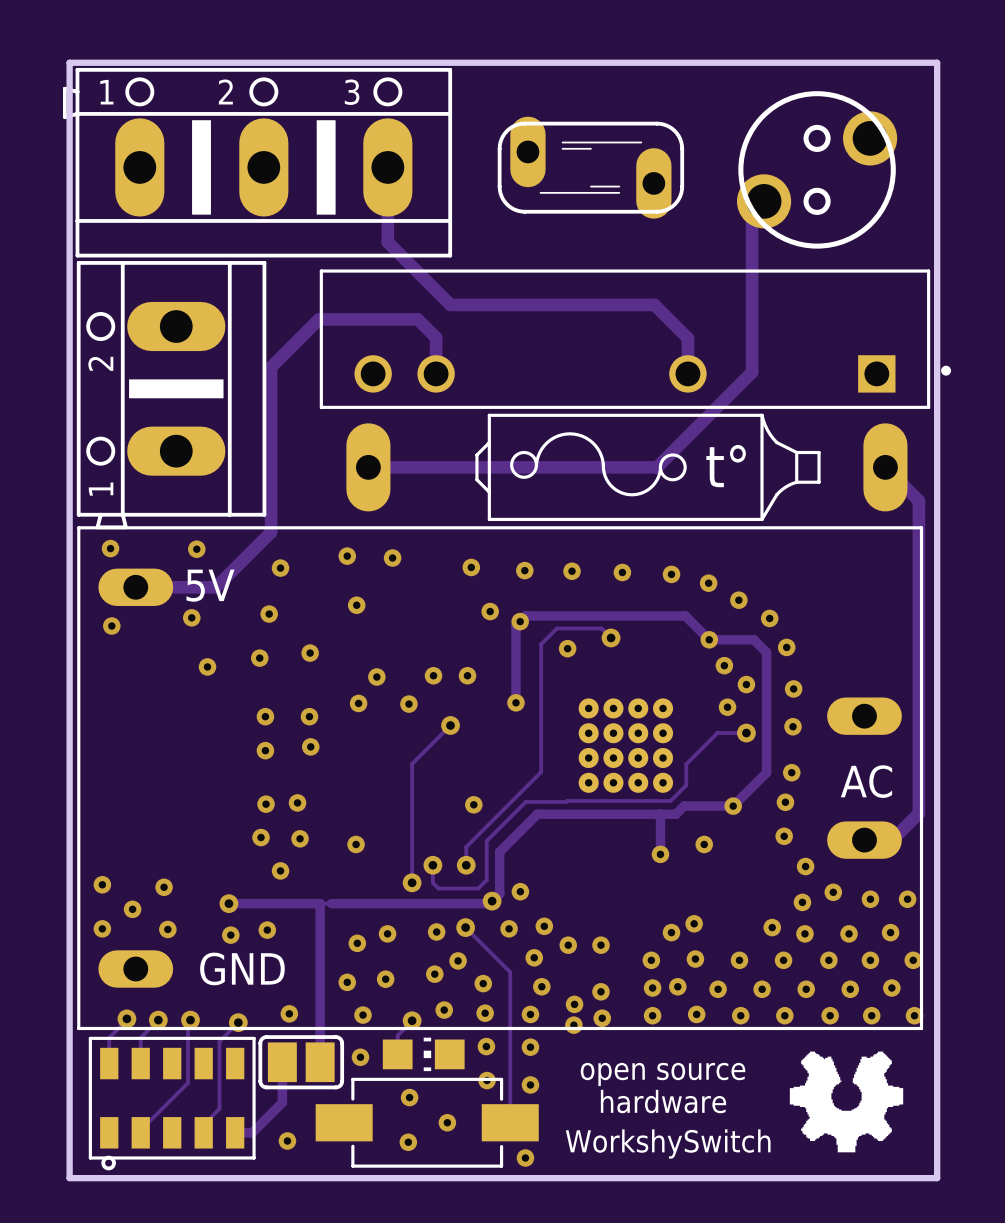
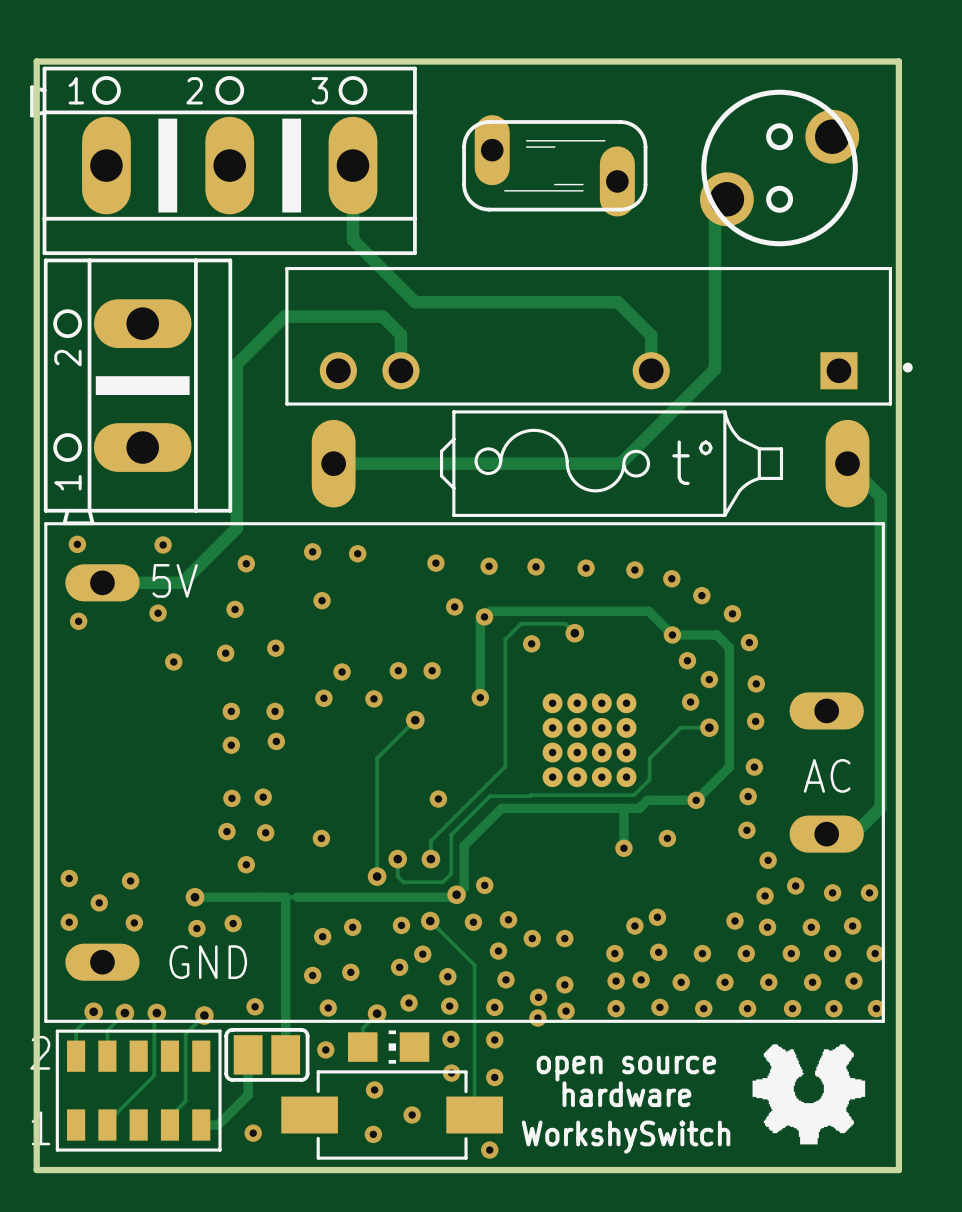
part footprint: [88, 1036, 256, 1171] -> [55, 1029, 222, 1152]

